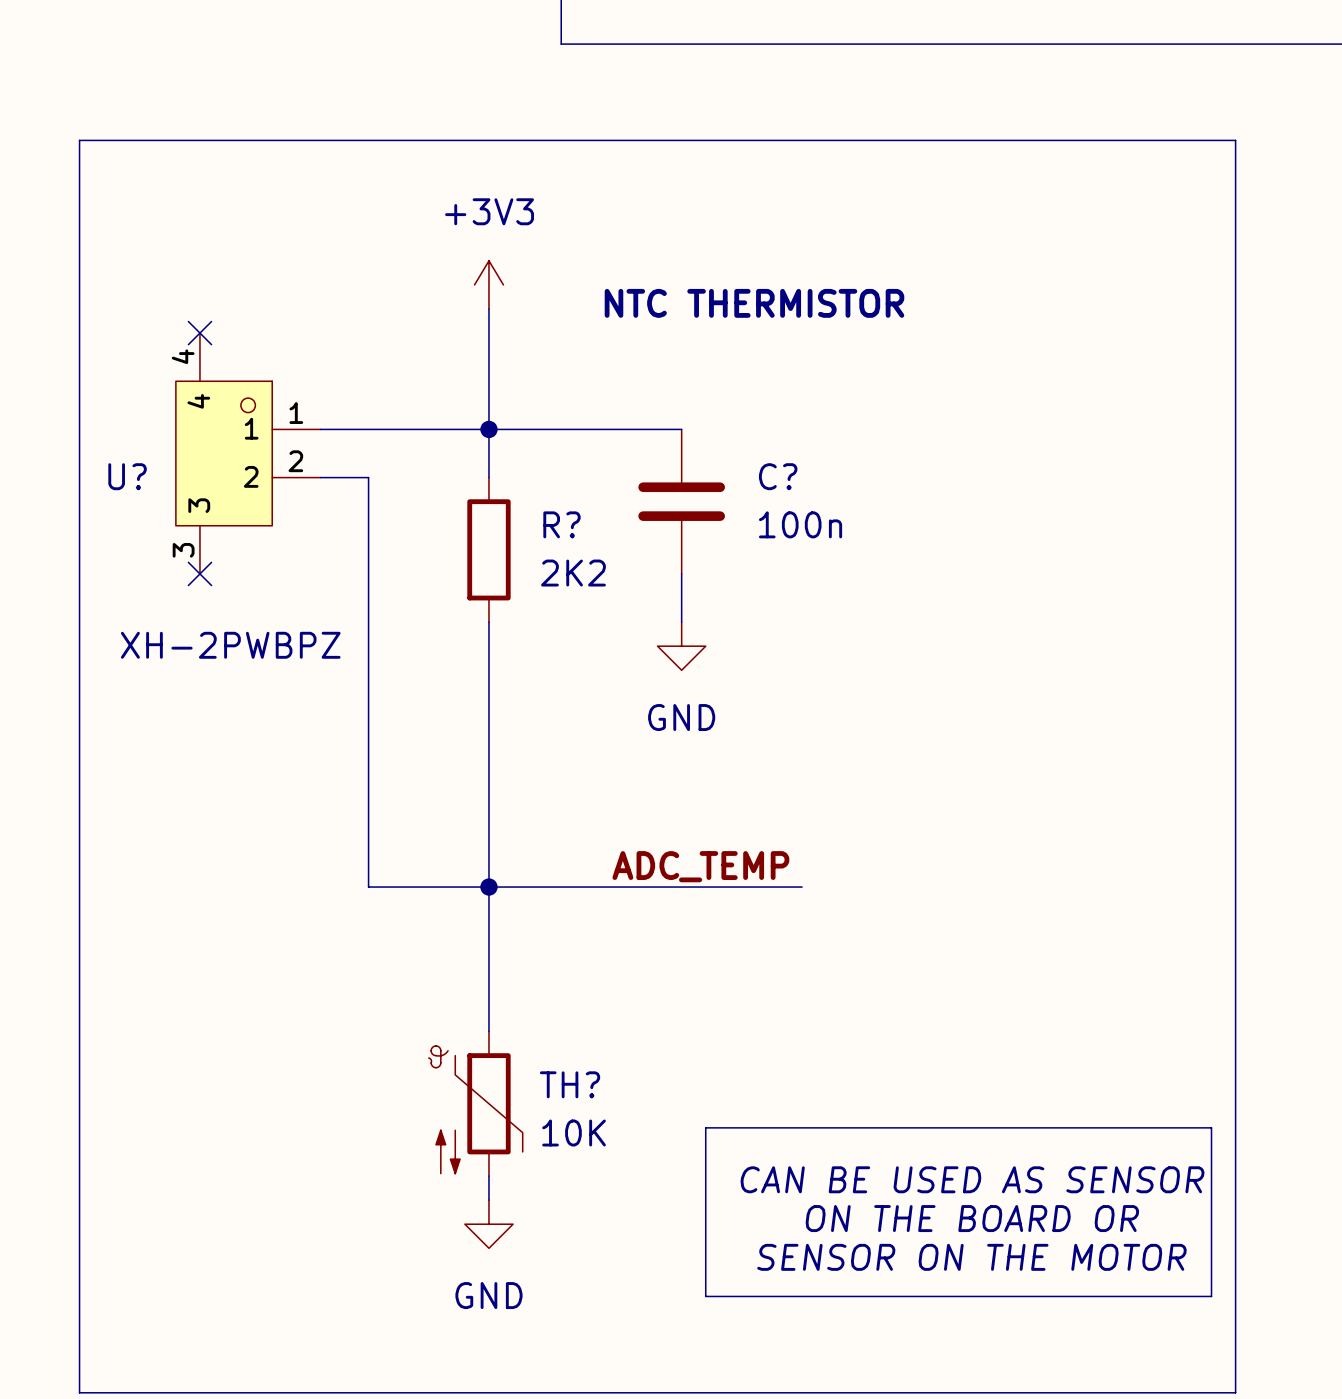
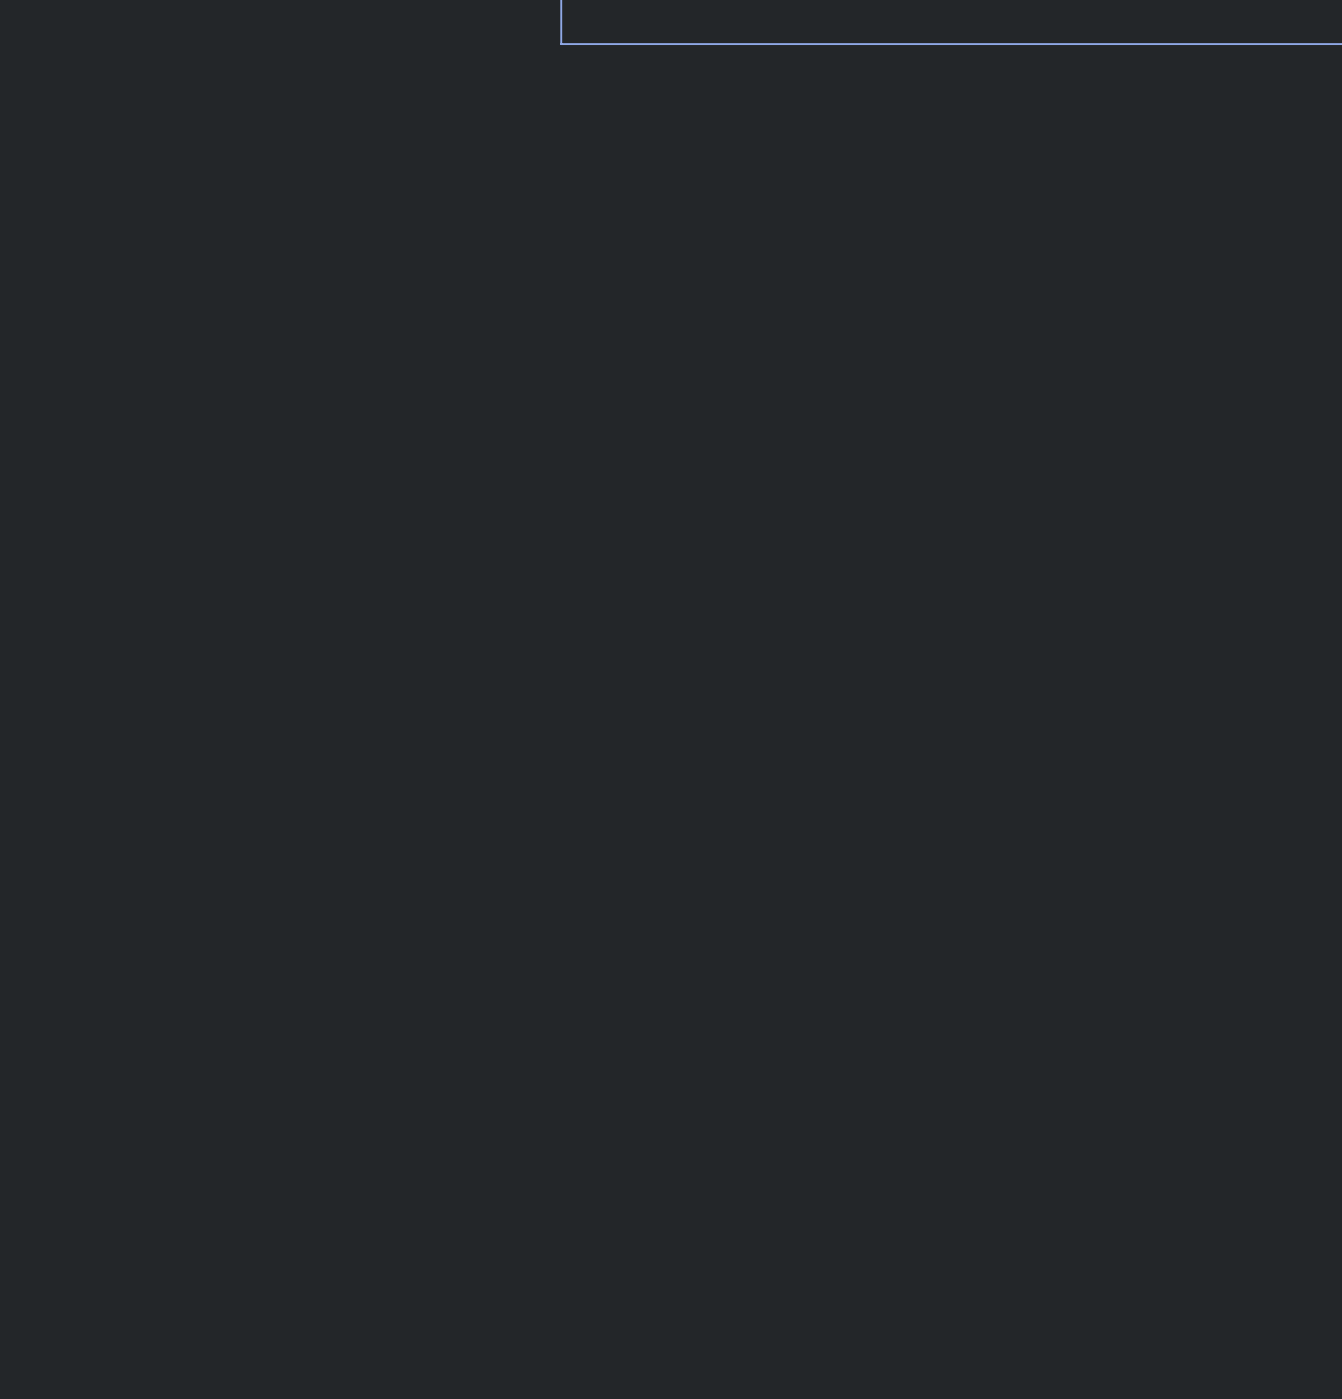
line: (79, 140) (1235, 140) (1235, 1392) (79, 1392) (79, 140) -> none
power symbol: +3V3 (488, 284) -> none
text: NTC THERMISTOR (754, 303) -> none
wire: (488, 309) (488, 477) -> none
no-connect mark: (199, 333) -> none
wire: (320, 429) (681, 429) -> none
junction: (488, 429) -> none
U?: XH-2PWBPZ (248, 453) -> none
wire: (320, 477) (368, 477) (368, 887) (802, 887) -> none
C?: 100n (681, 501) -> none
R?: 2K2 (488, 549) -> none
no-connect mark: (199, 573) -> none
wire: (681, 573) (681, 622) -> none
wire: (488, 622) (488, 1031) -> none
power symbol: GND (681, 646) -> none
label: ADC_TEMP (700, 866) -> none
junction: (488, 887) -> none
TH?: 10K (475, 1103) -> none
line: (705, 1127) (1211, 1127) (1211, 1296) (705, 1296) (705, 1127) -> none
wire: (488, 1176) (488, 1200) -> none
text: CAN BE USED AS SENSOR (972, 1179) -> none
text: ON THE BOARD OR (972, 1218) -> none
power symbol: GND (488, 1224) -> none
text: SENSOR ON THE MOTOR (971, 1257) -> none

